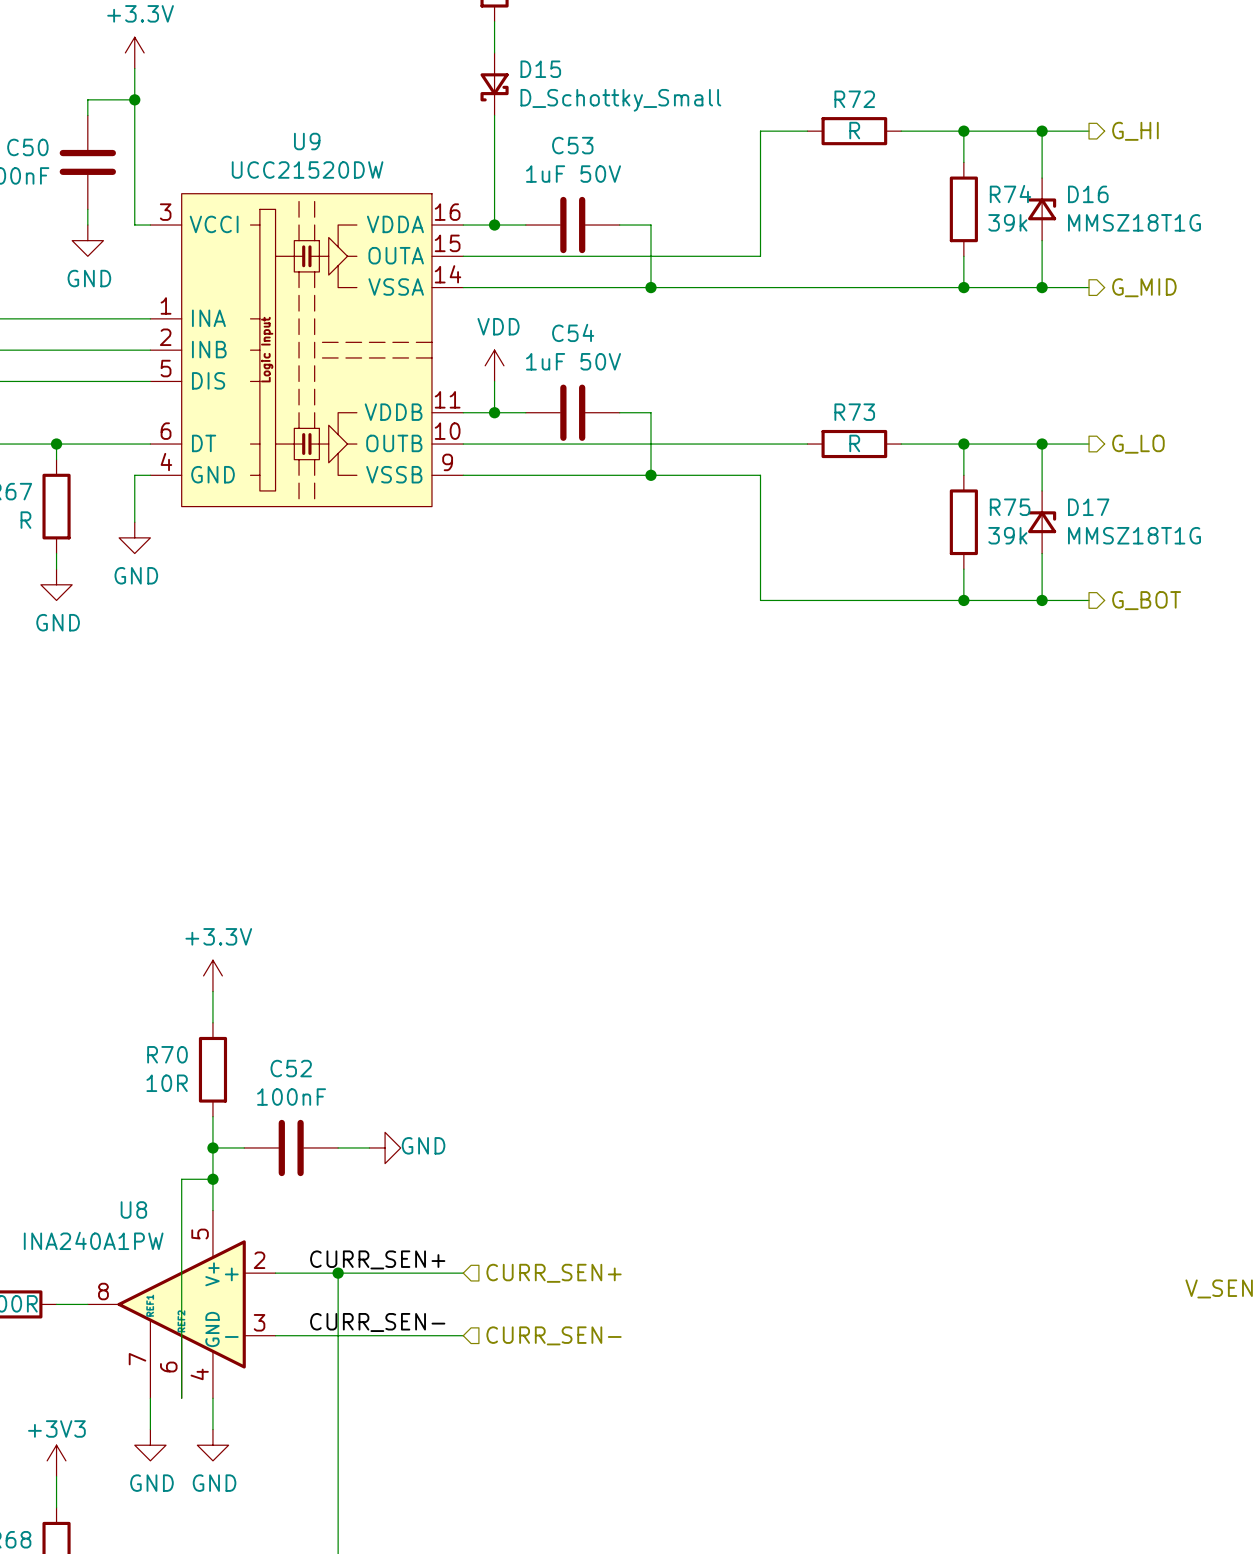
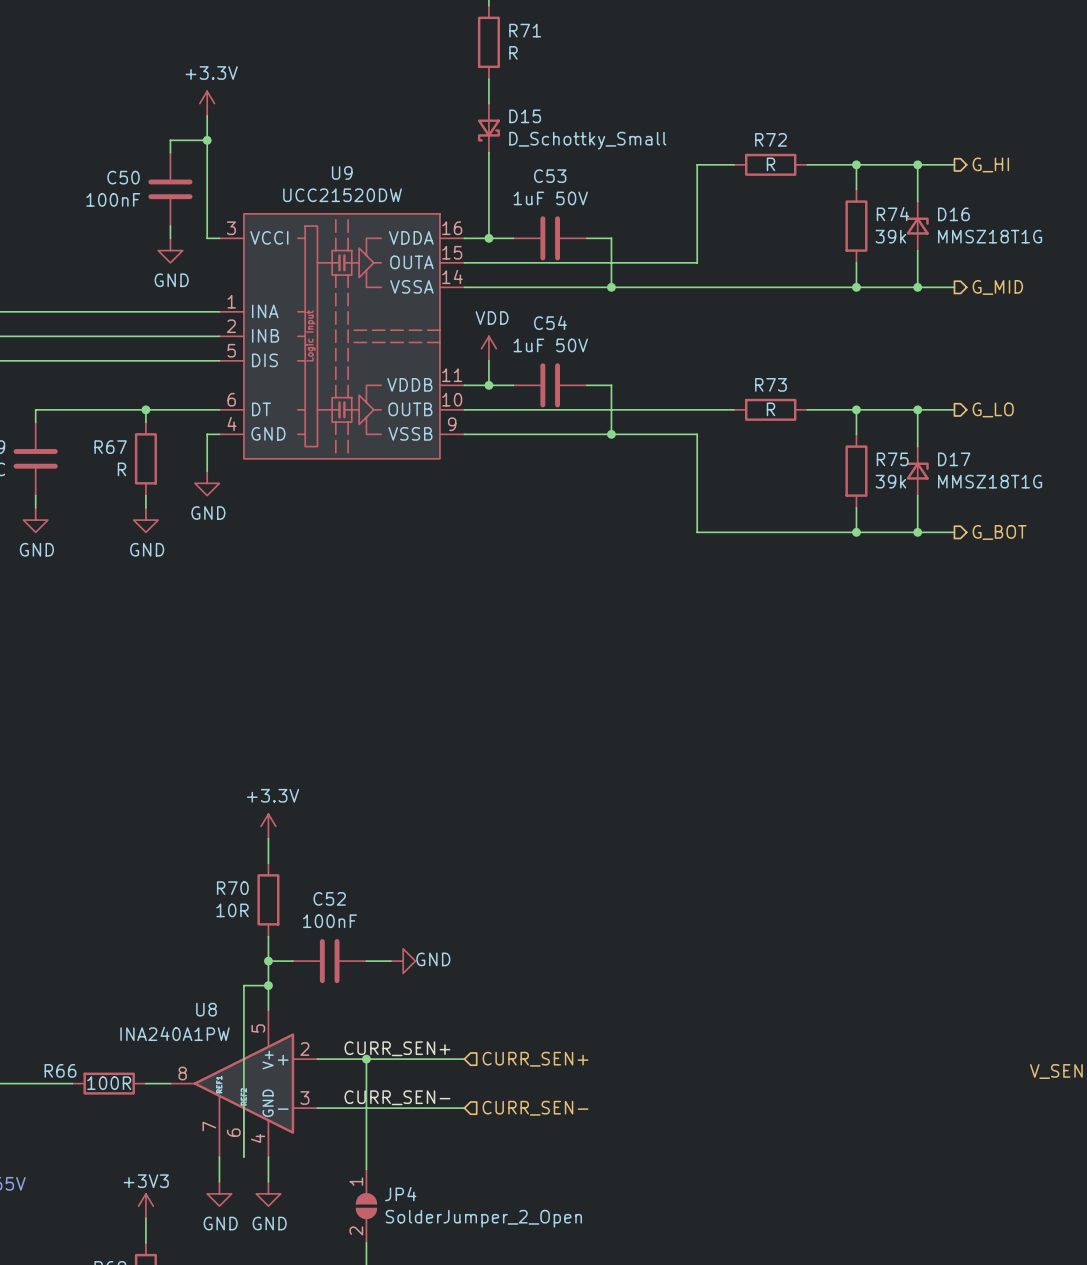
JP4: none -> SolderJumper_2_Open (366, 1206)

